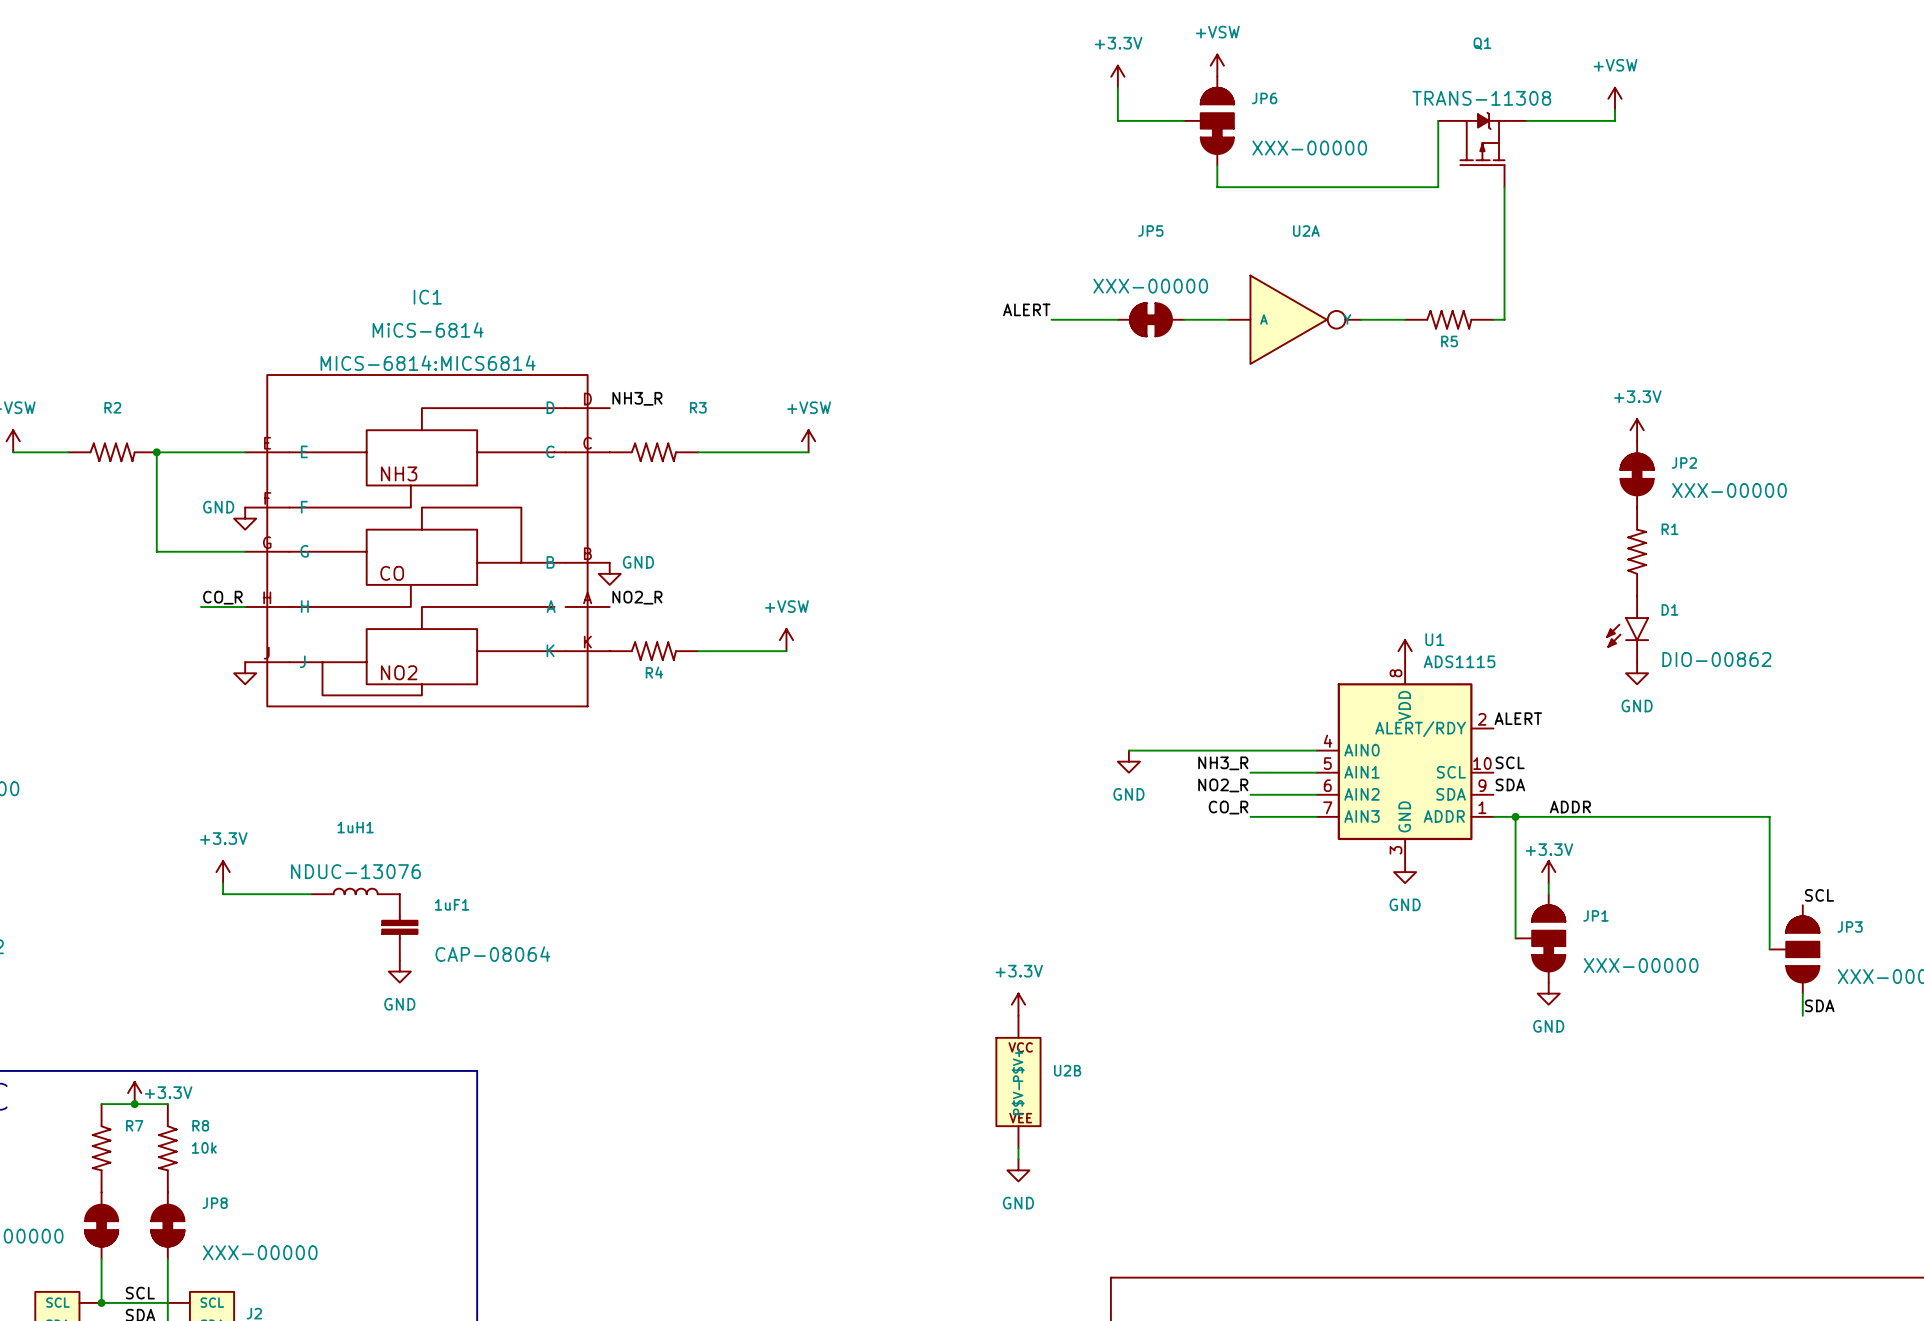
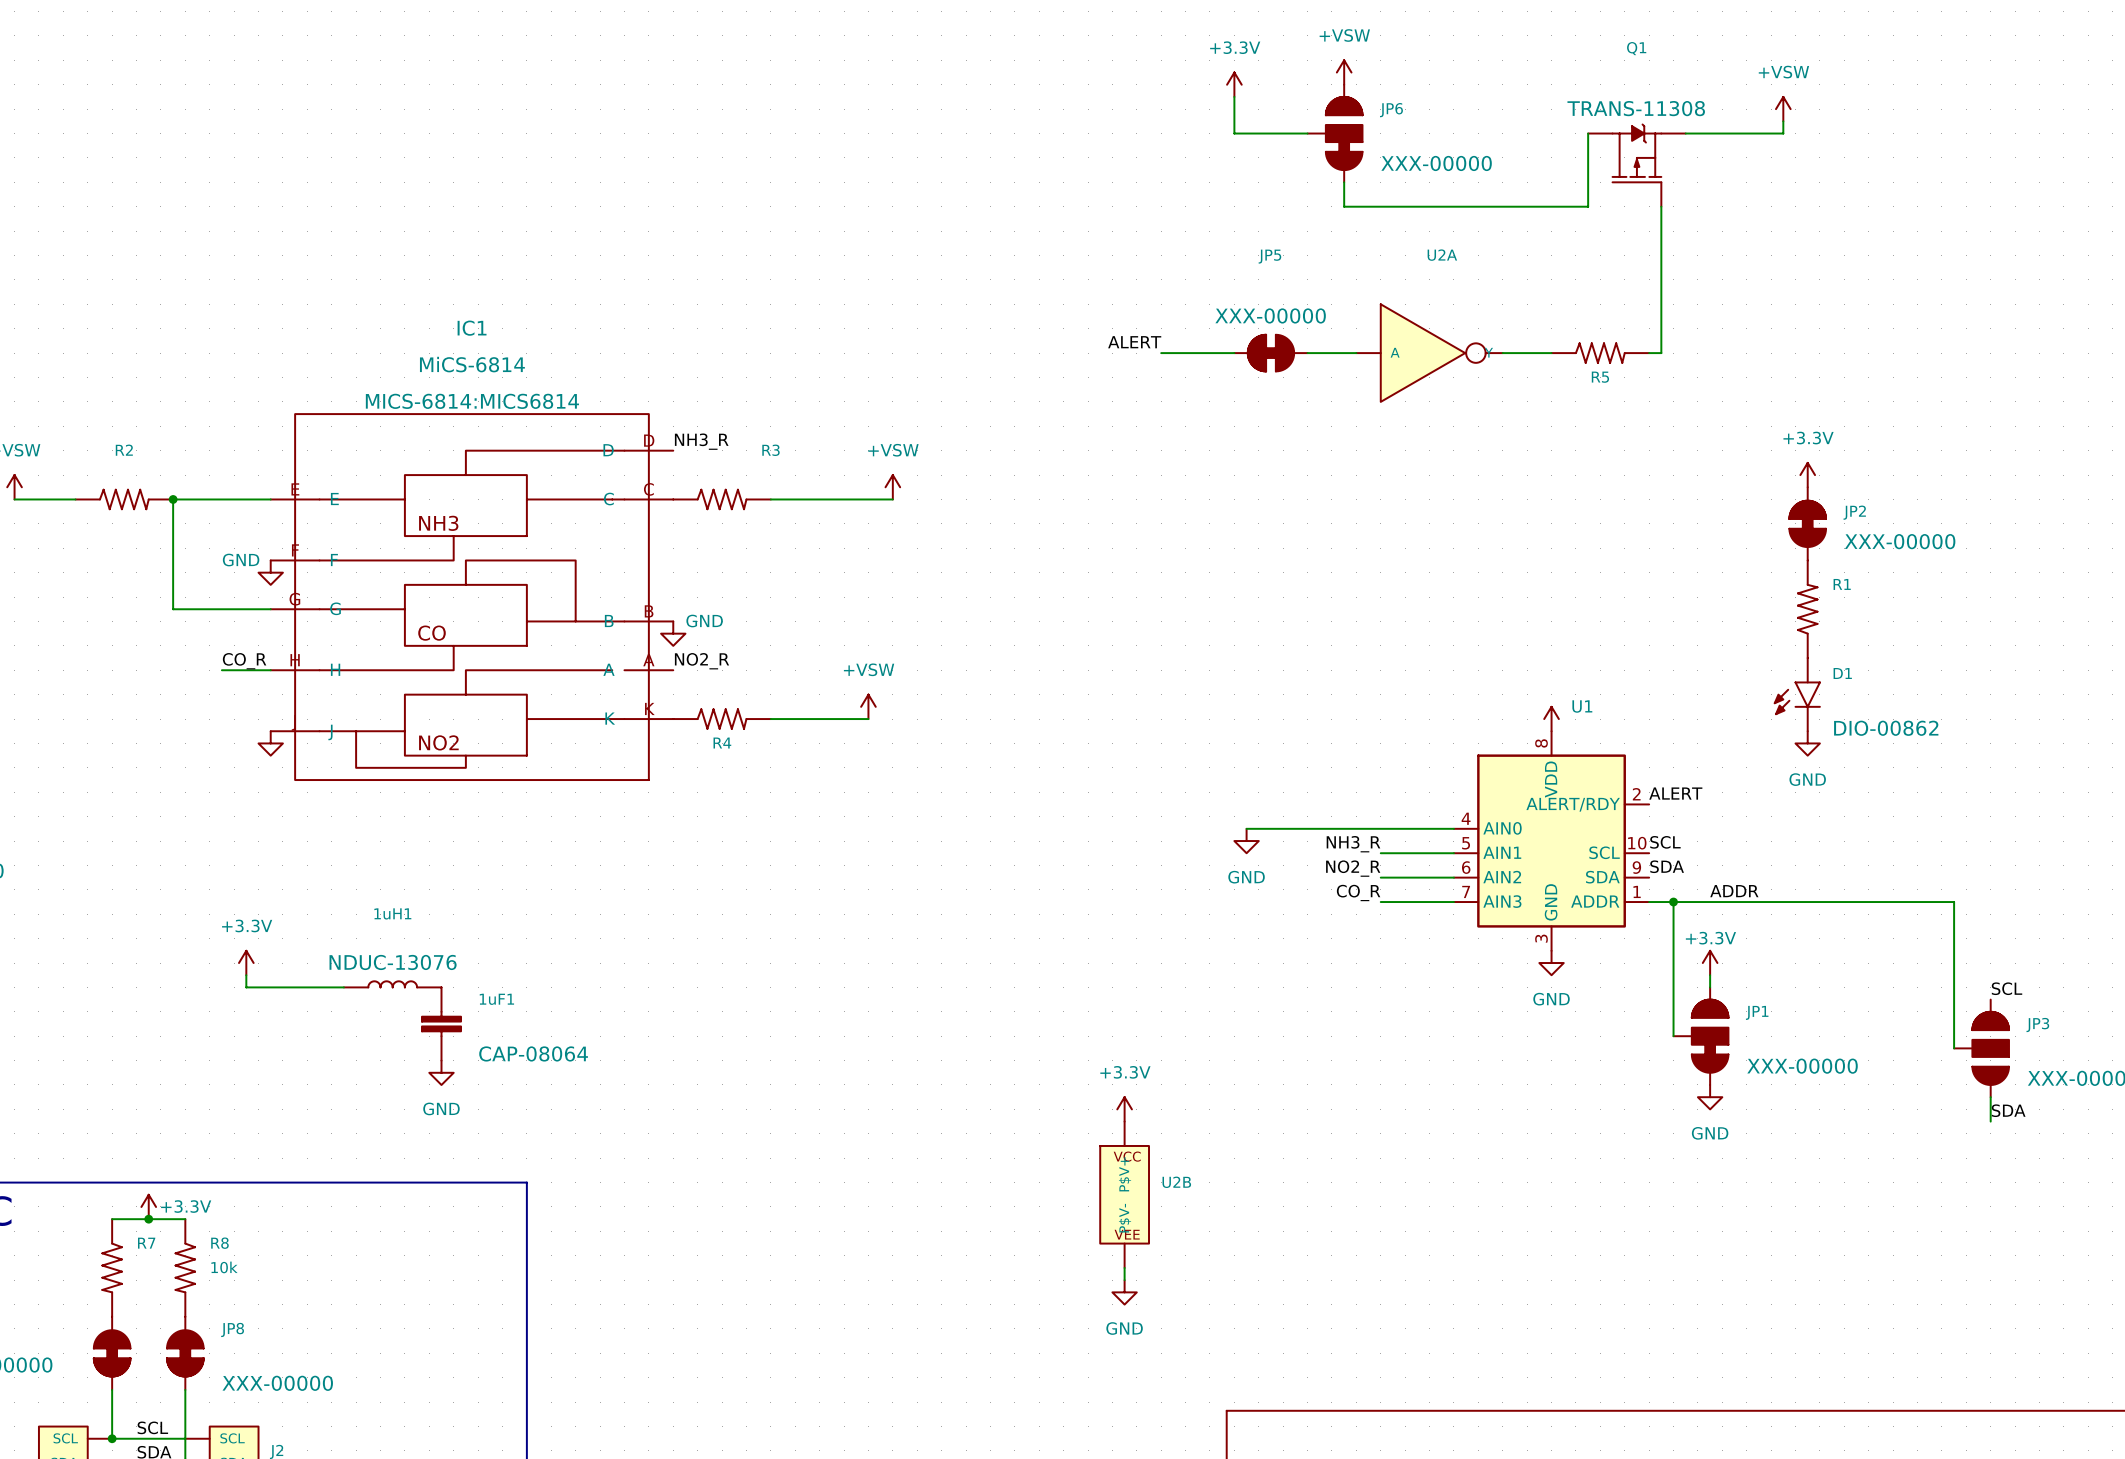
U1 value: ADS1115 (1459, 661) -> none

